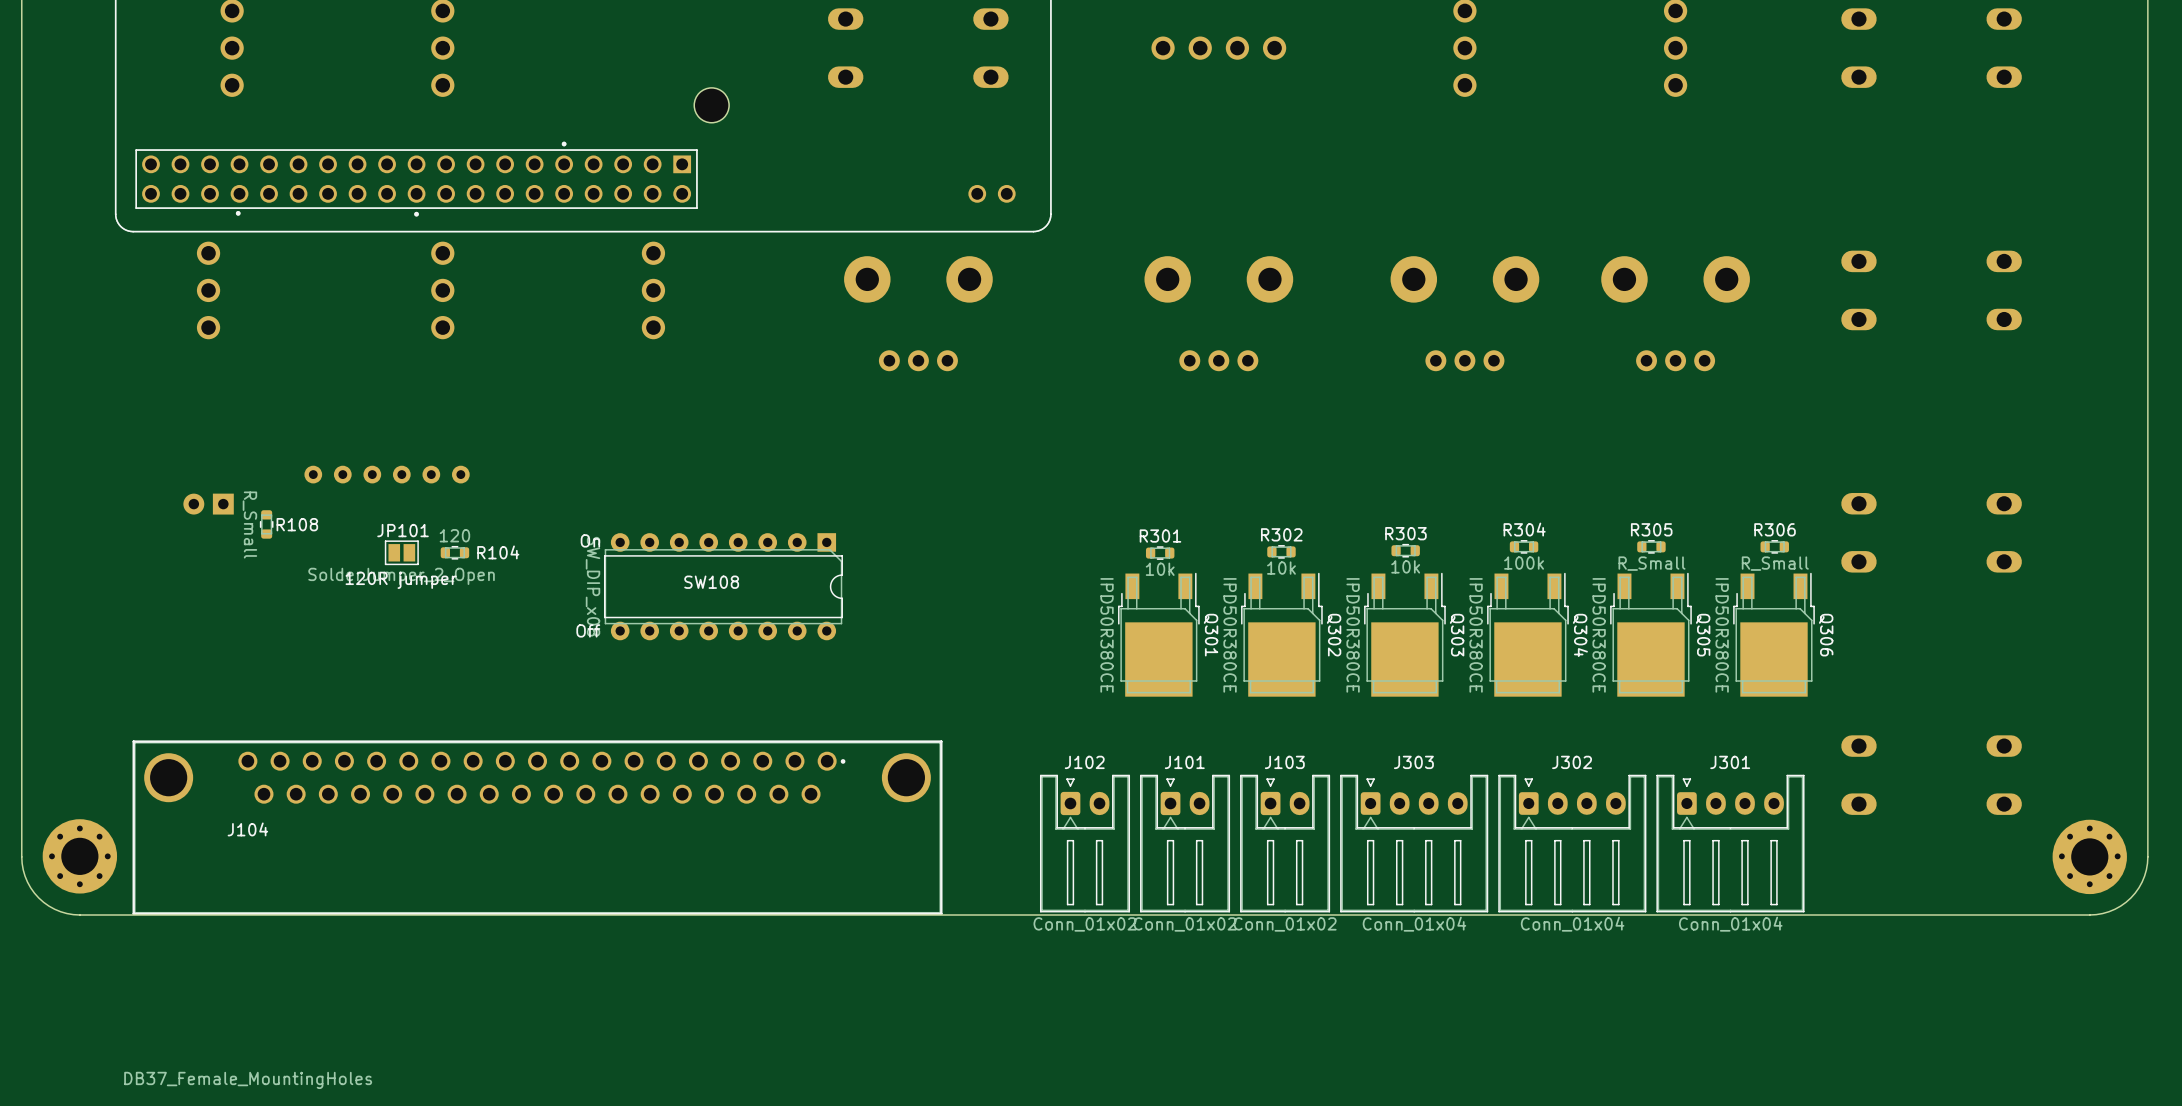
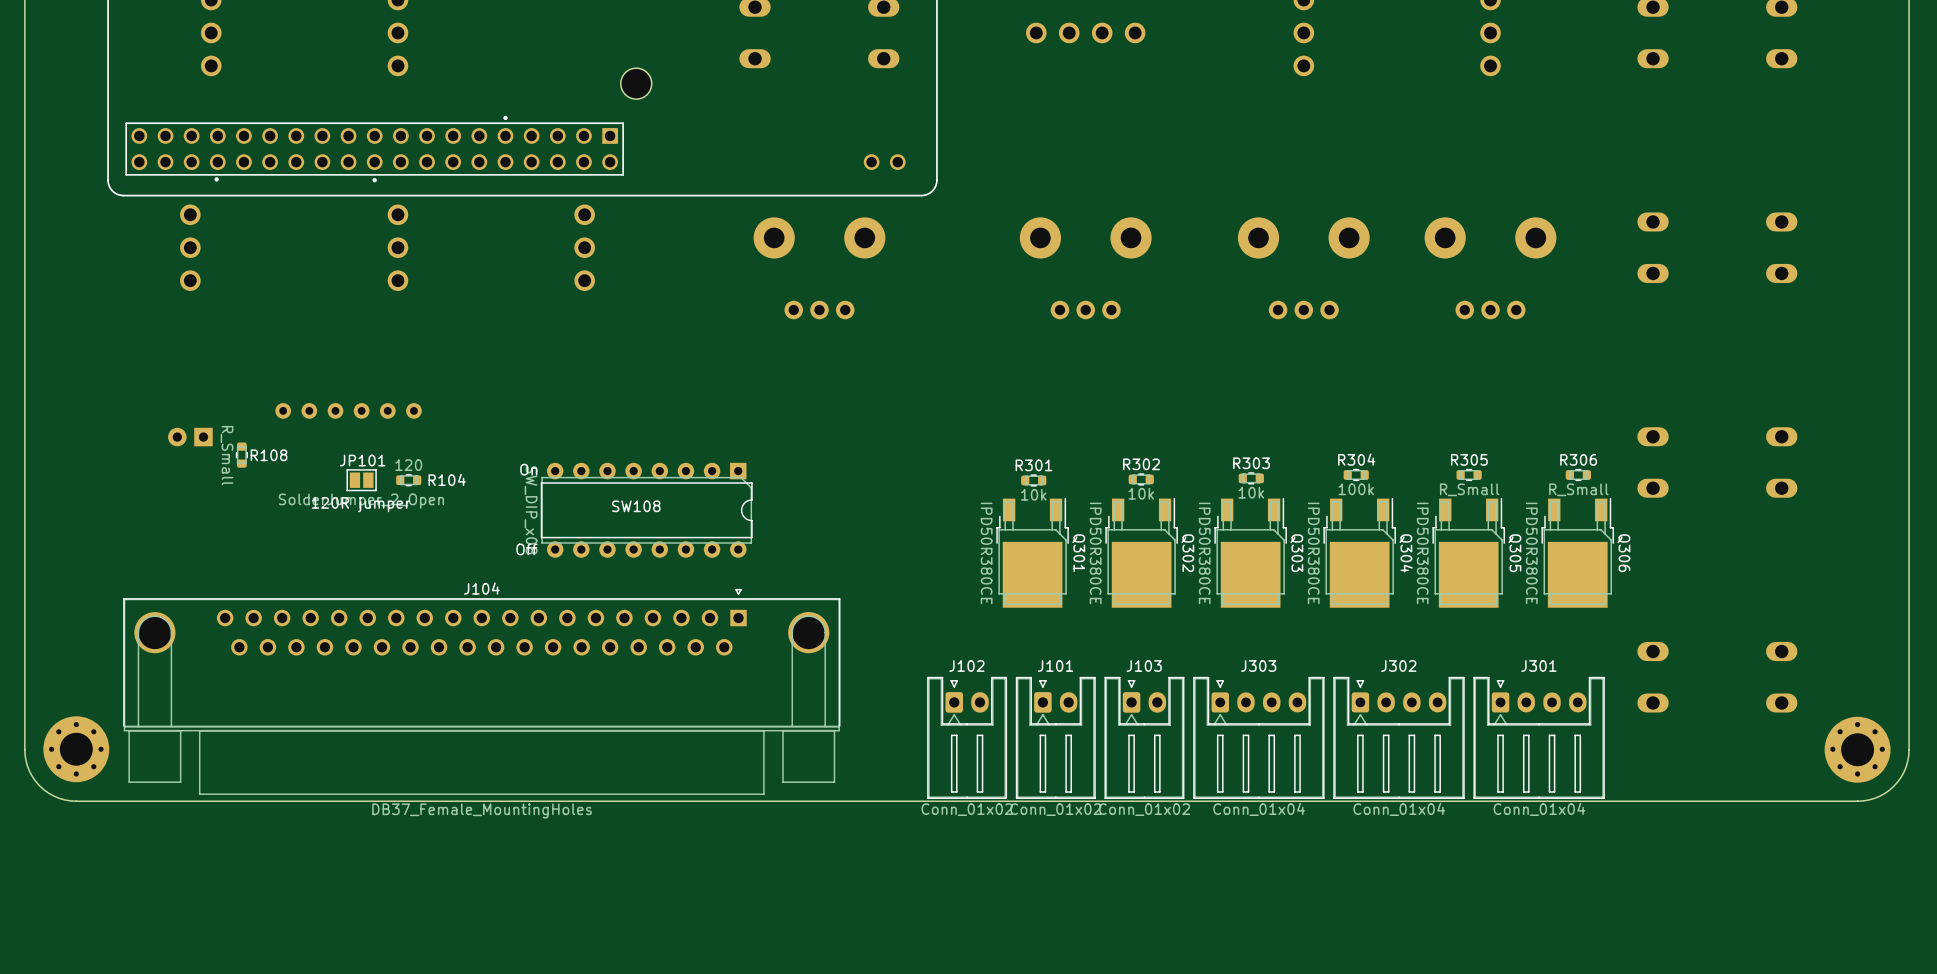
J104 footprint: [132, 740, 943, 916] -> [123, 589, 841, 795]
J104 name position: J104 (247, 829) -> J104 (481, 588)
J104 value position: DB37_Female_MountingHoles (248, 1080) -> DB37_Female_MountingHoles (482, 810)

